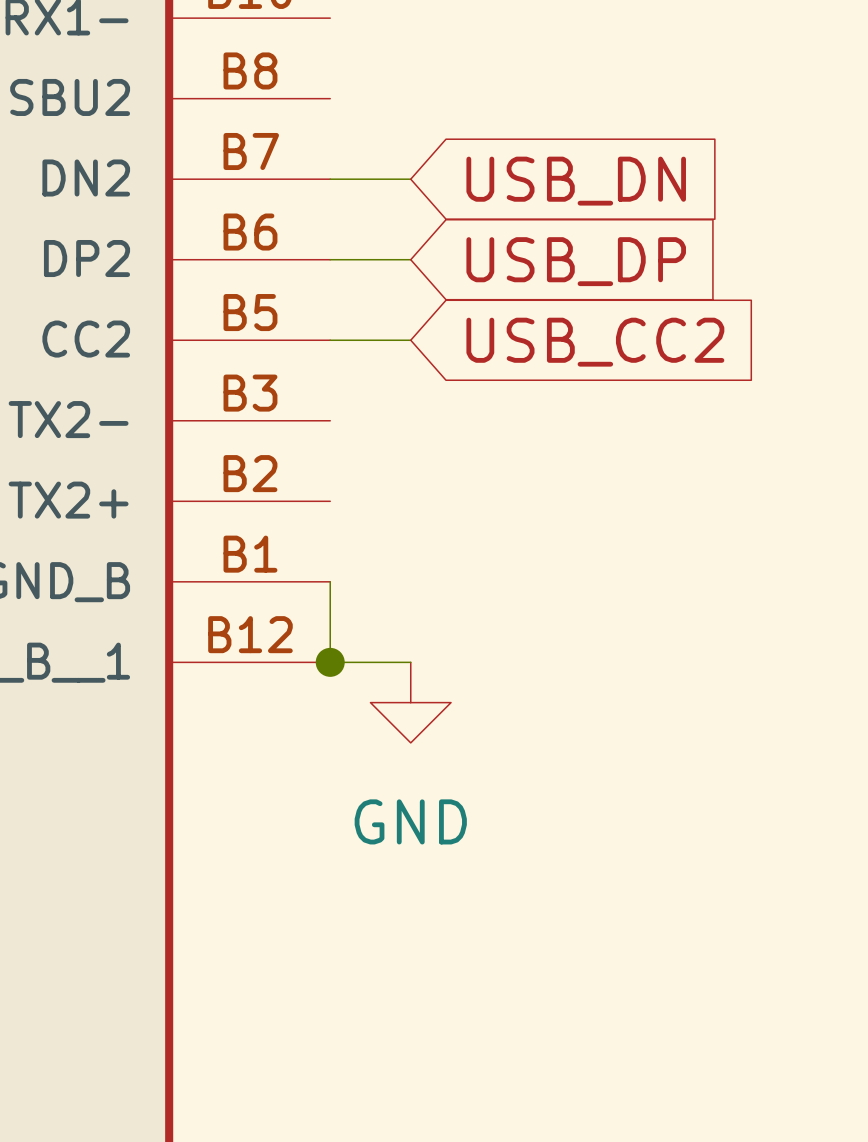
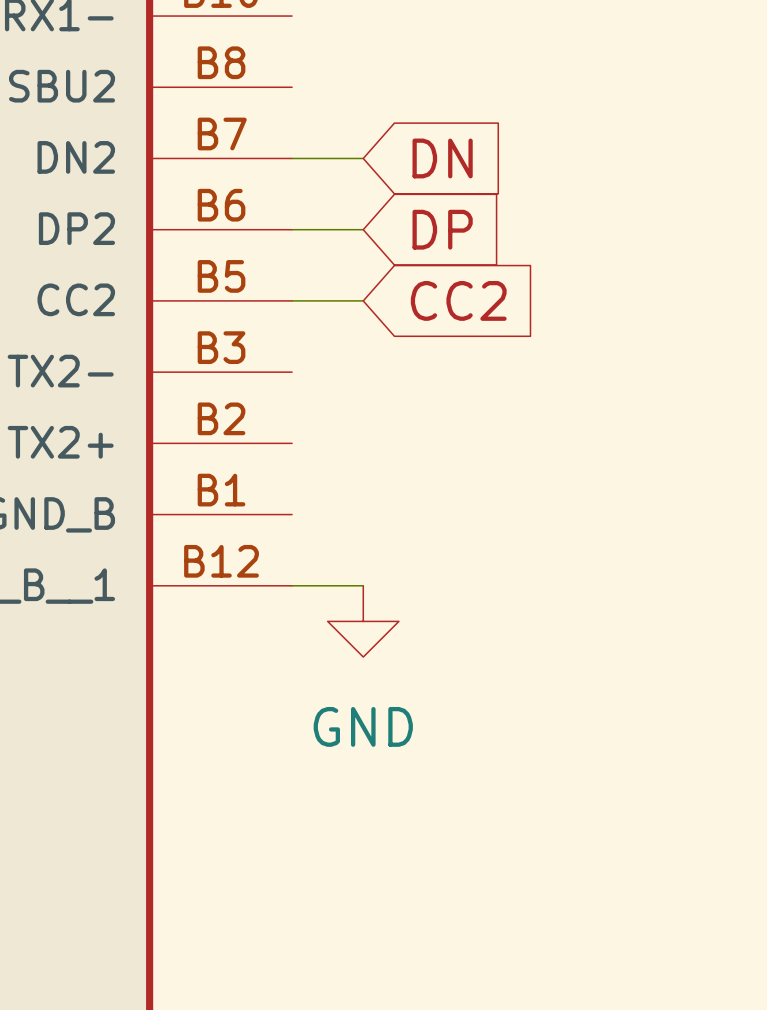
global label: USB_DN (576, 181) -> DN (442, 158)
global label: USB_DP (576, 261) -> DP (442, 229)
global label: USB_CC2 (595, 342) -> CC2 (458, 300)
wire: (330, 581) (330, 662) -> none
junction: (330, 662) -> none

